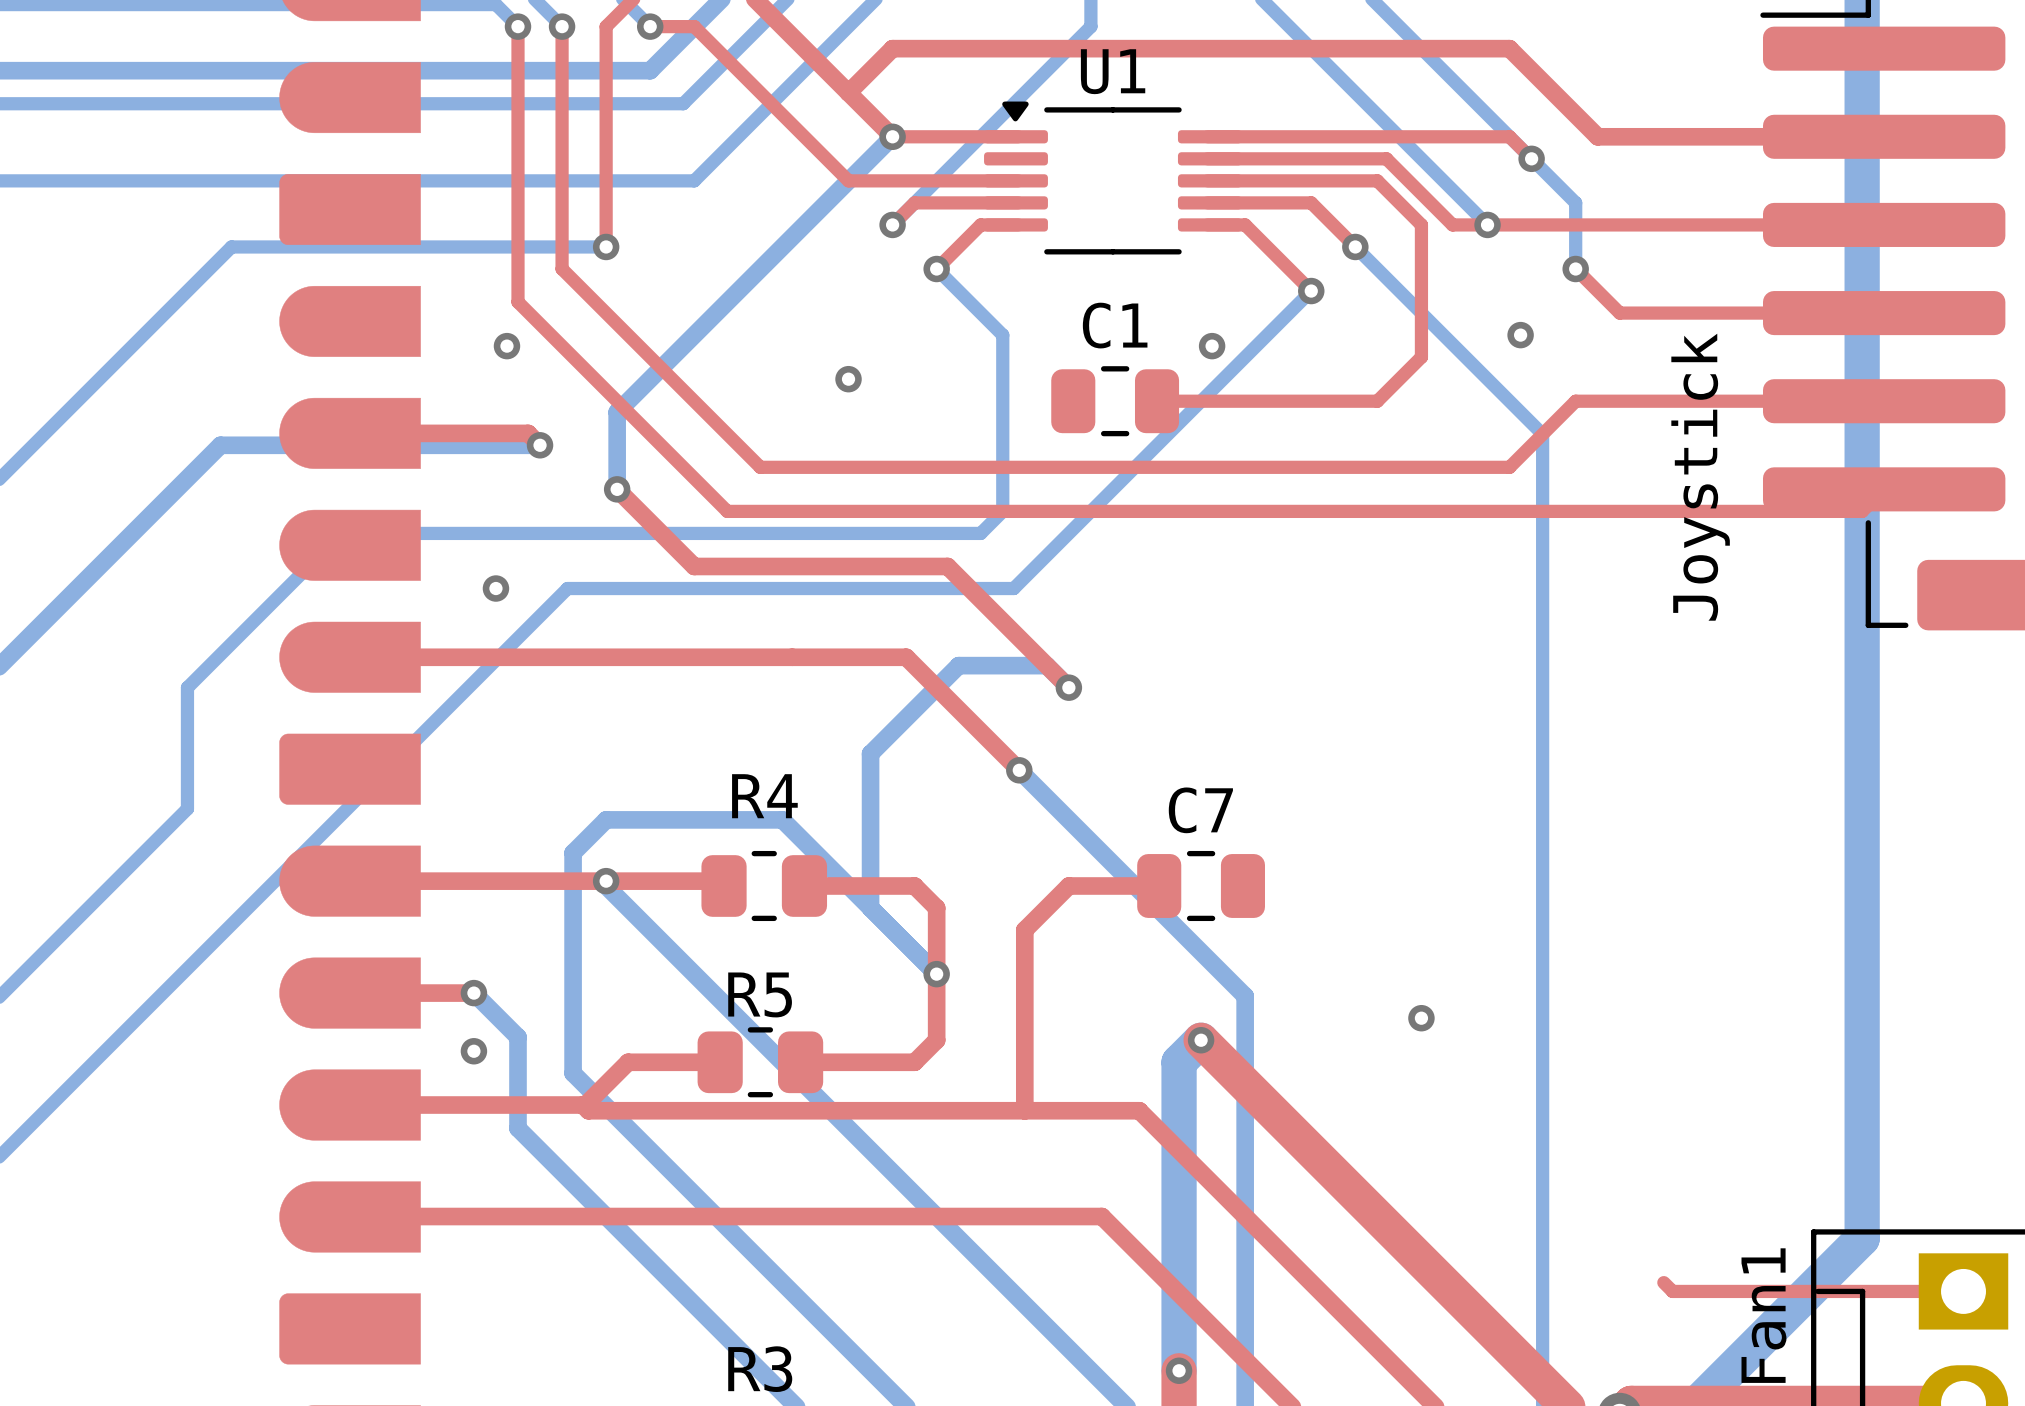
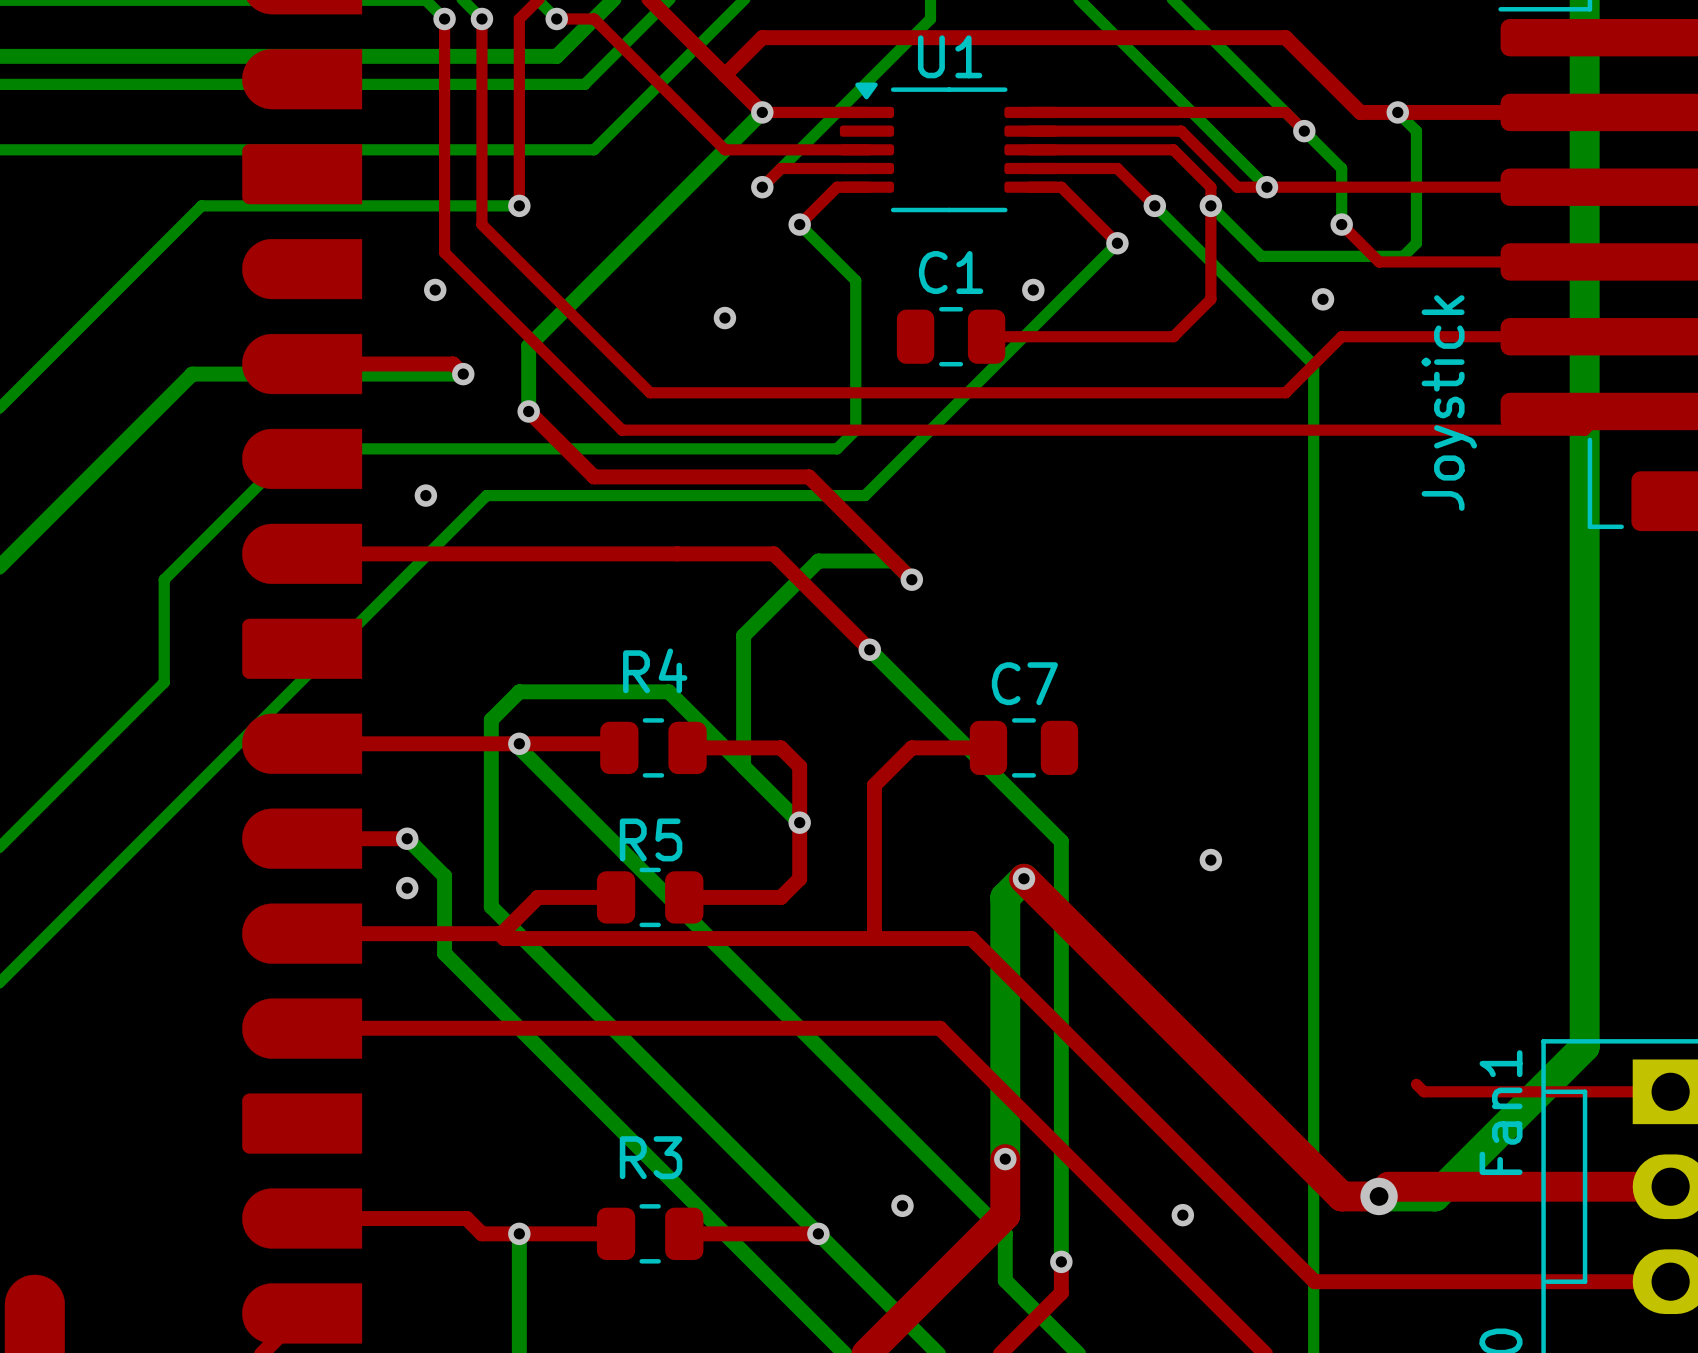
bottom track: none -> (1397, 112) (1416, 131) (1416, 243) (1403, 256) (1261, 256) (1210, 205)
via: none -> (1397, 112)
via: none -> (1210, 205)
via position: (1520, 335) -> (1323, 299)

